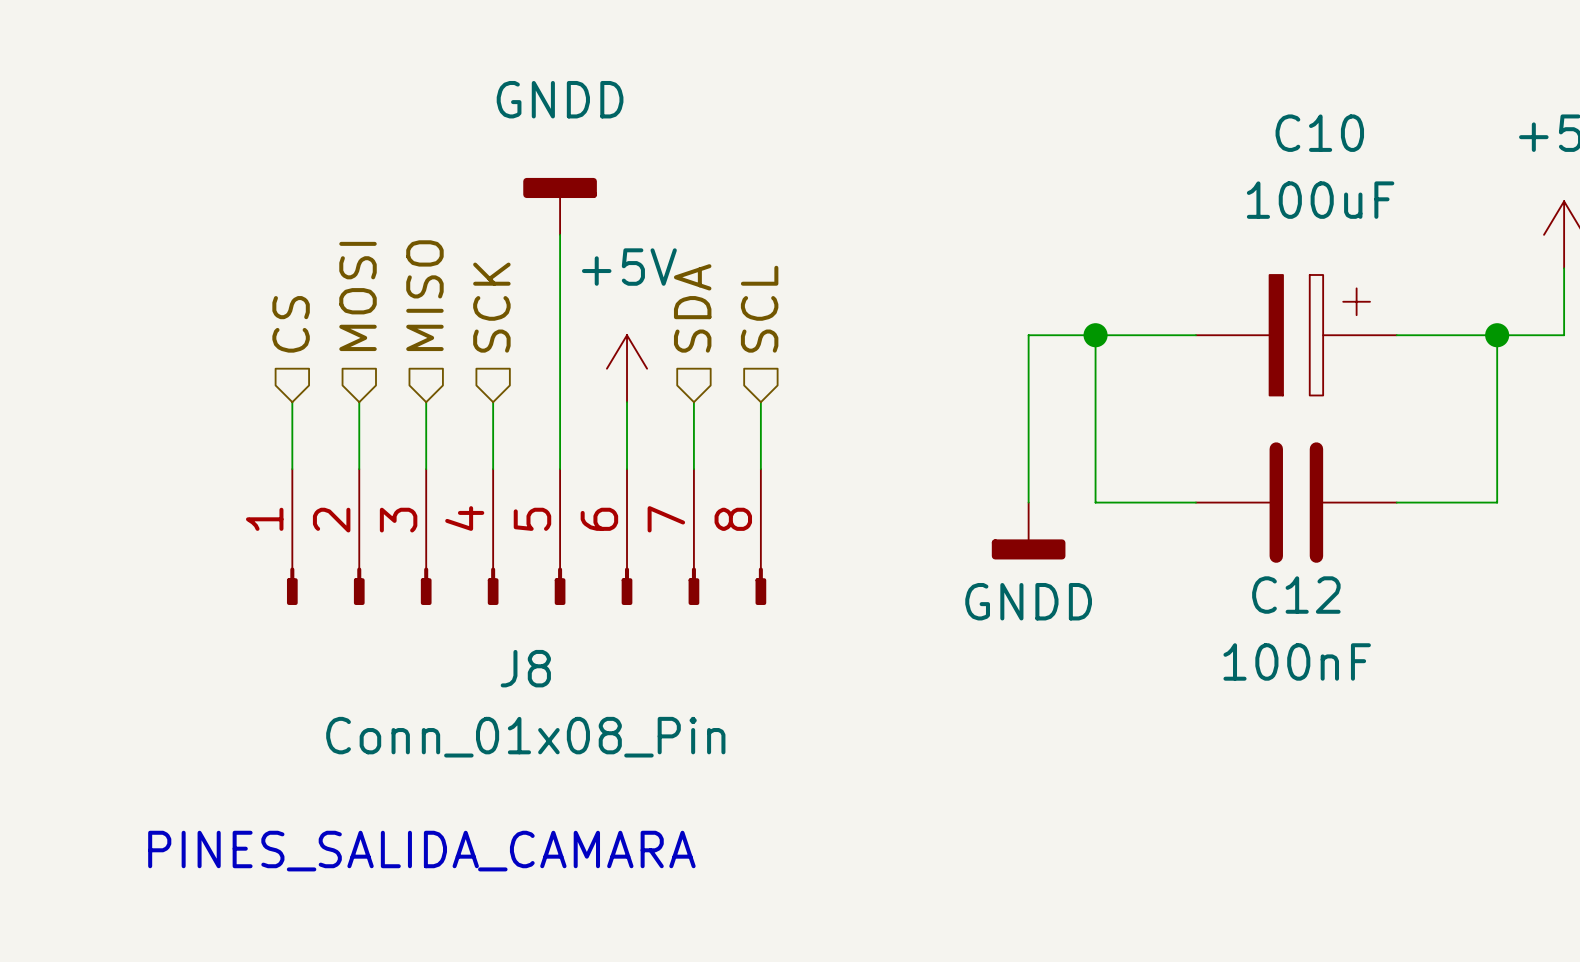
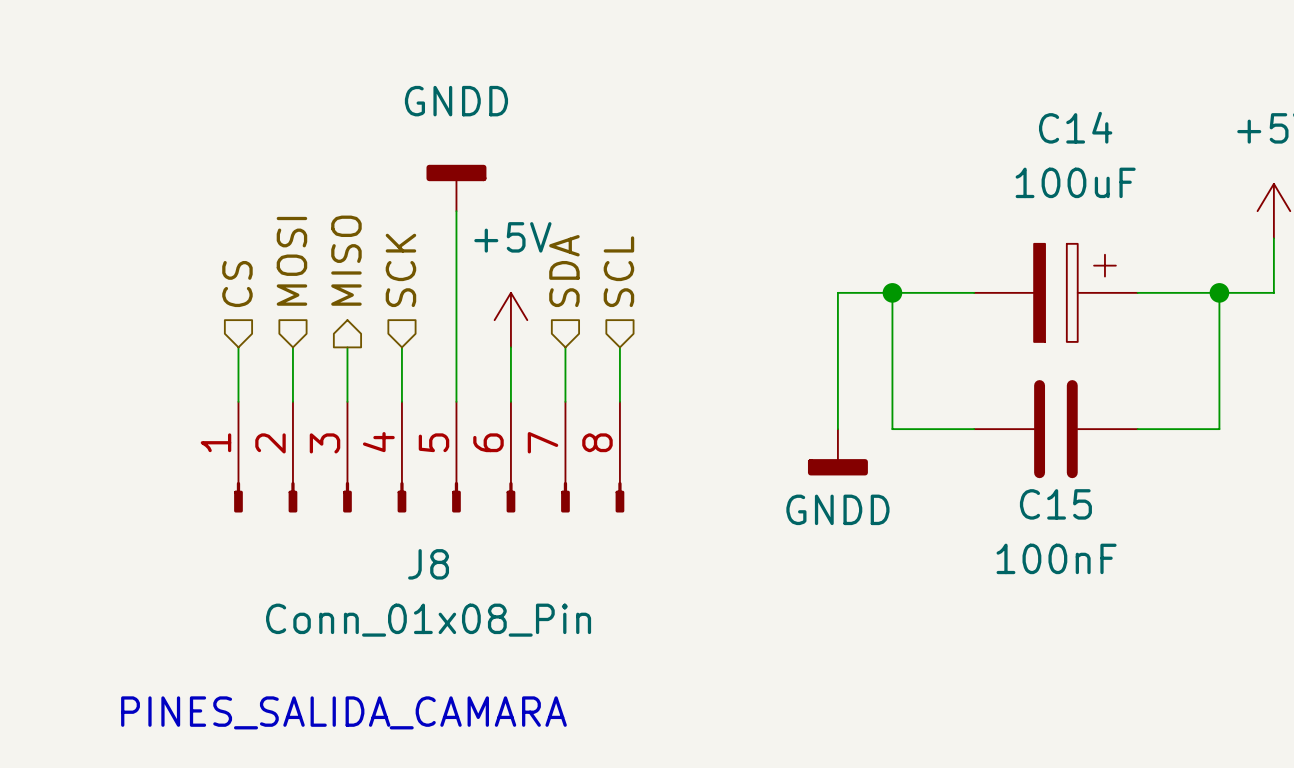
C10 name: C10 (1319, 133) -> C14 (1075, 127)
hierarchical label shape: input (424, 295) -> output (346, 260)
C12 name: C12 (1296, 595) -> C15 (1055, 504)

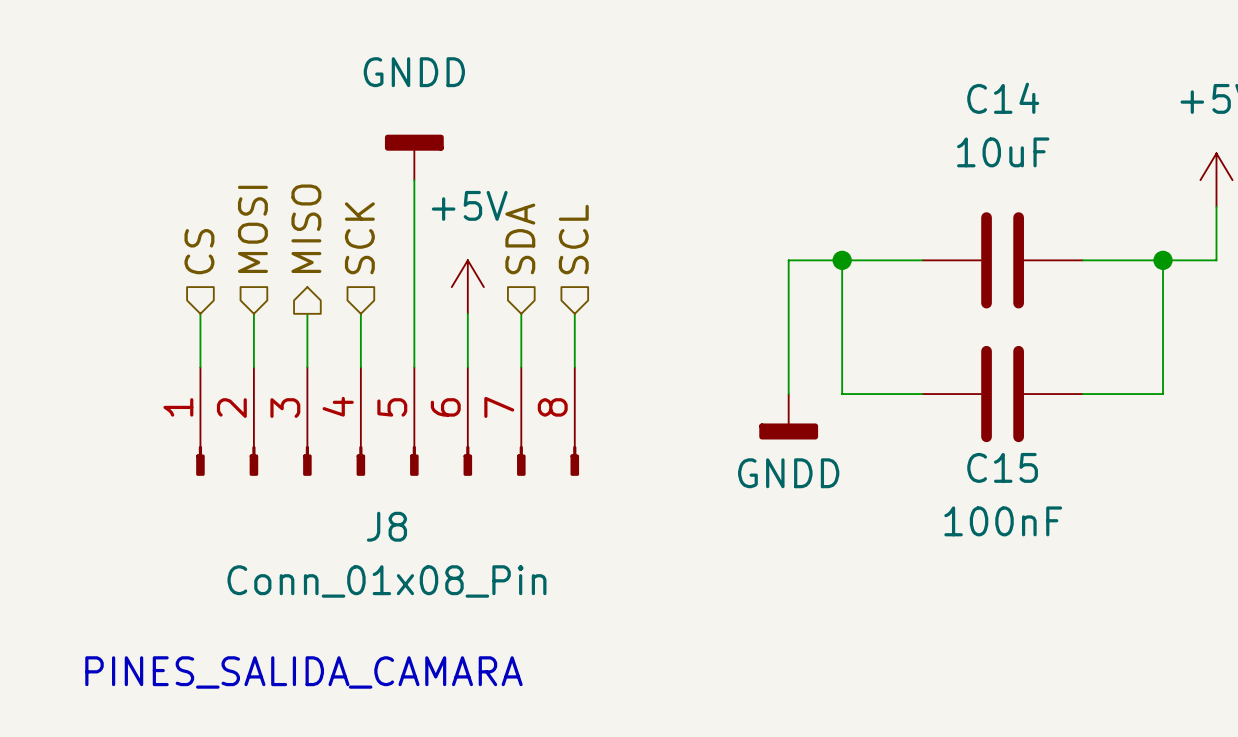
C14 value: 100uF (1075, 182) -> 10uF (1003, 152)
C14 symbol: [974, 243, 1138, 342] -> [922, 212, 1083, 309]

